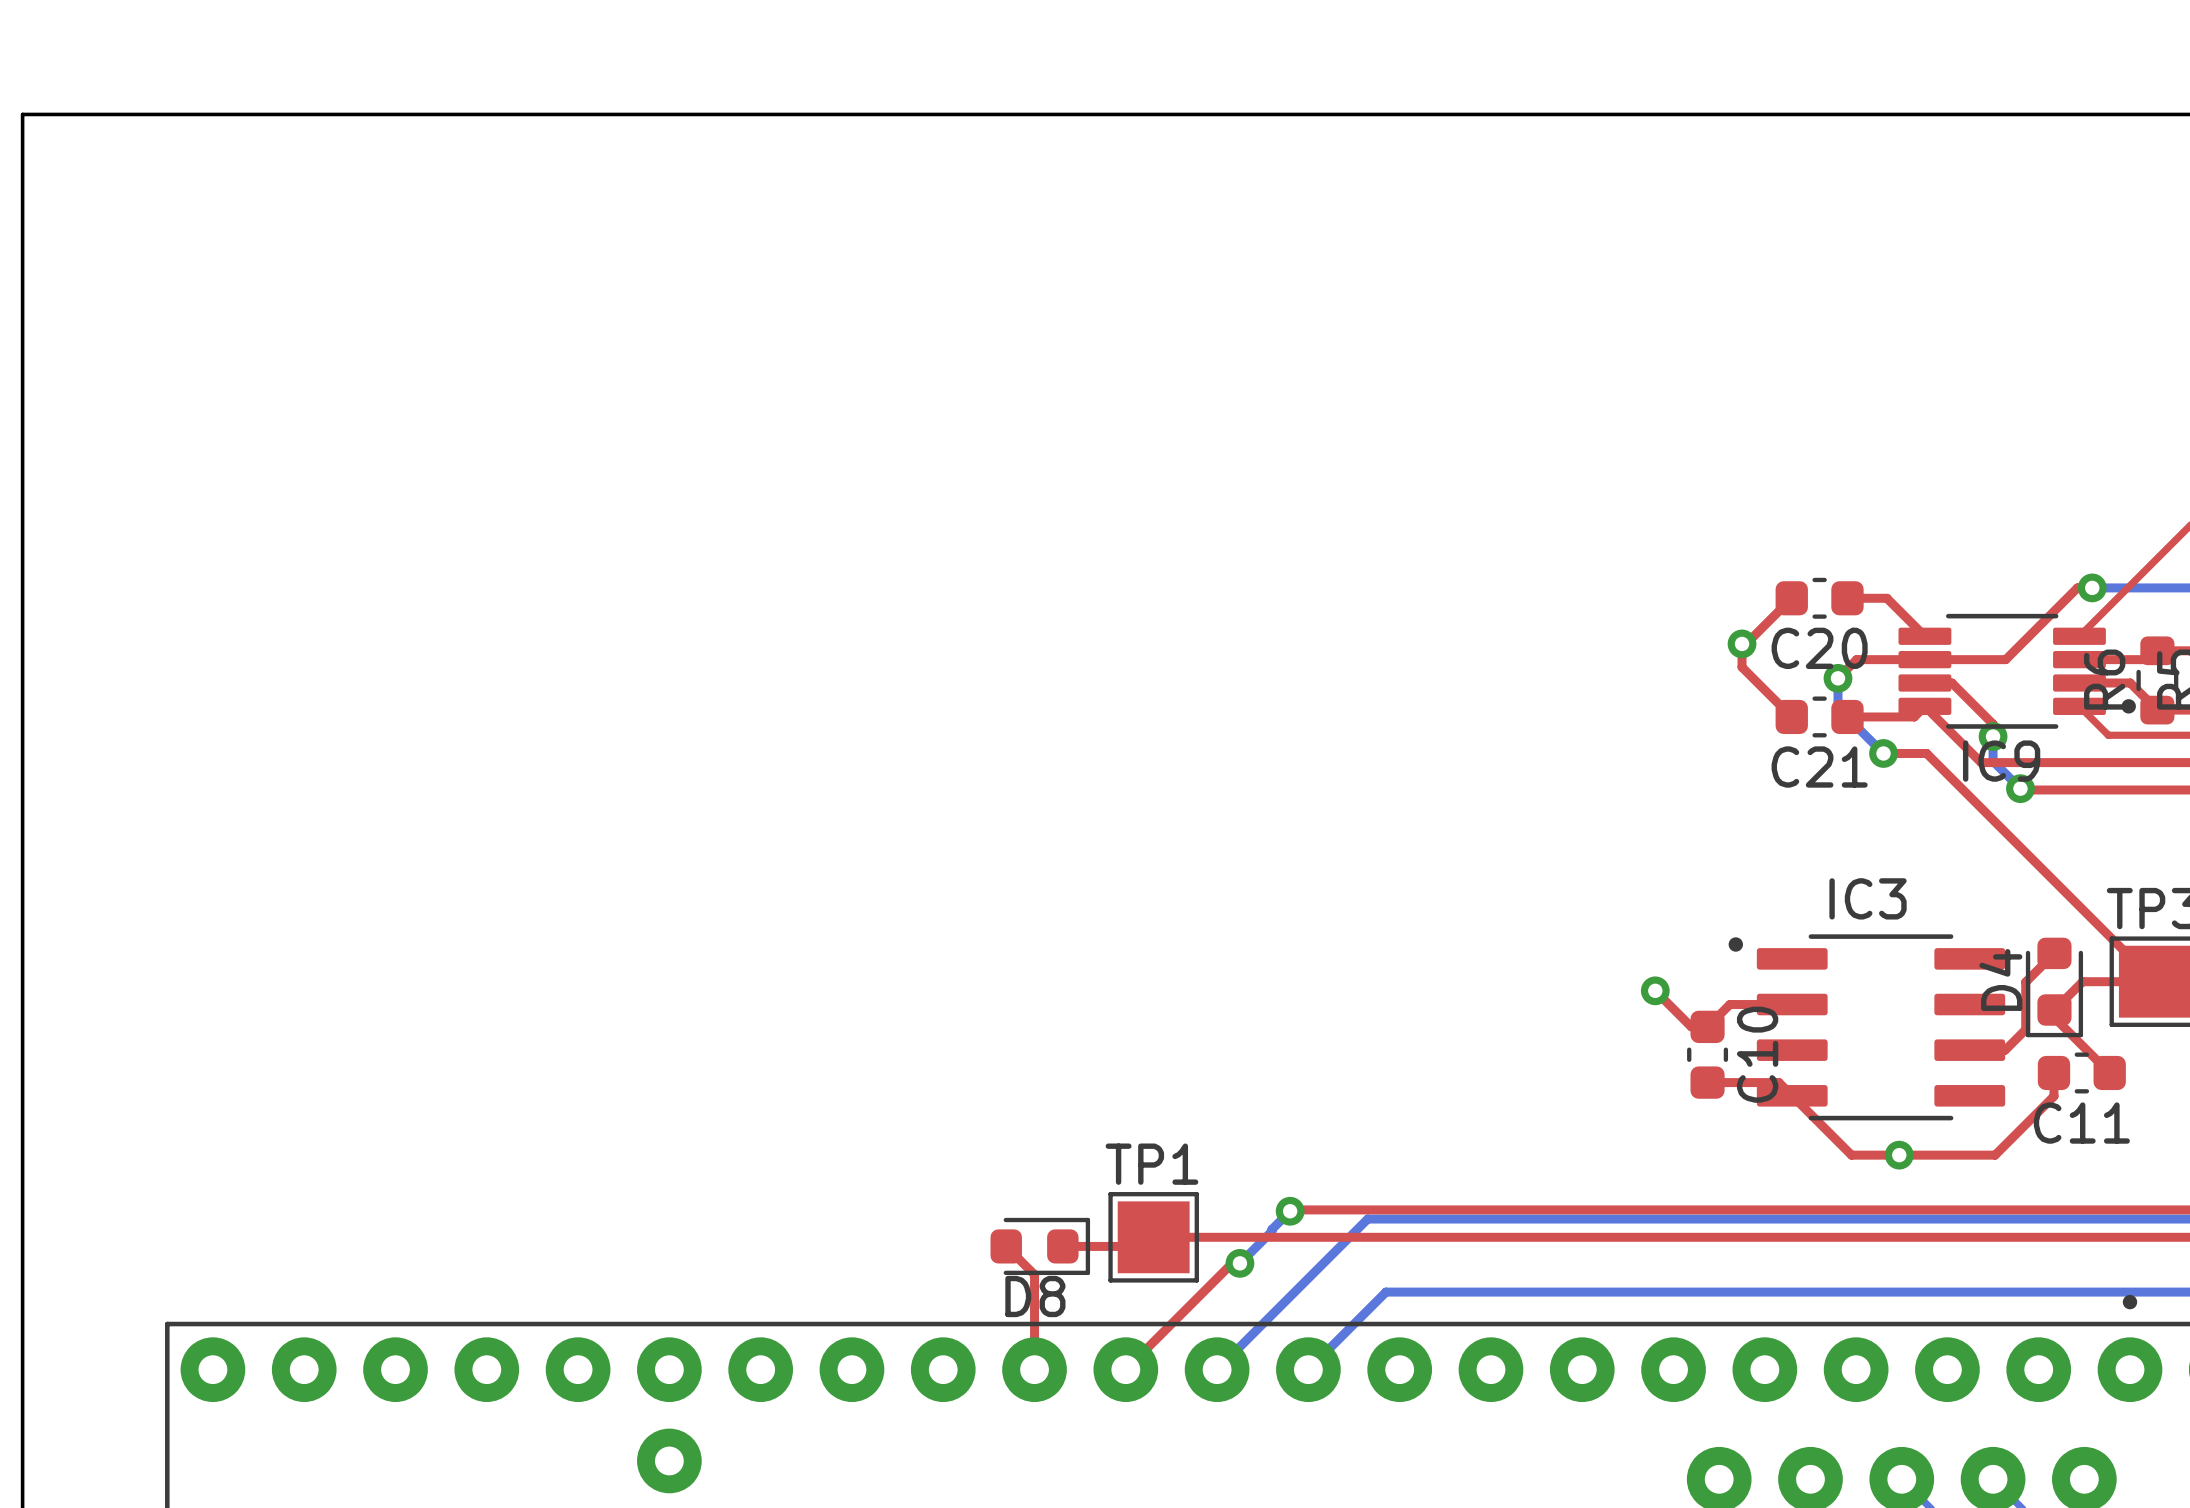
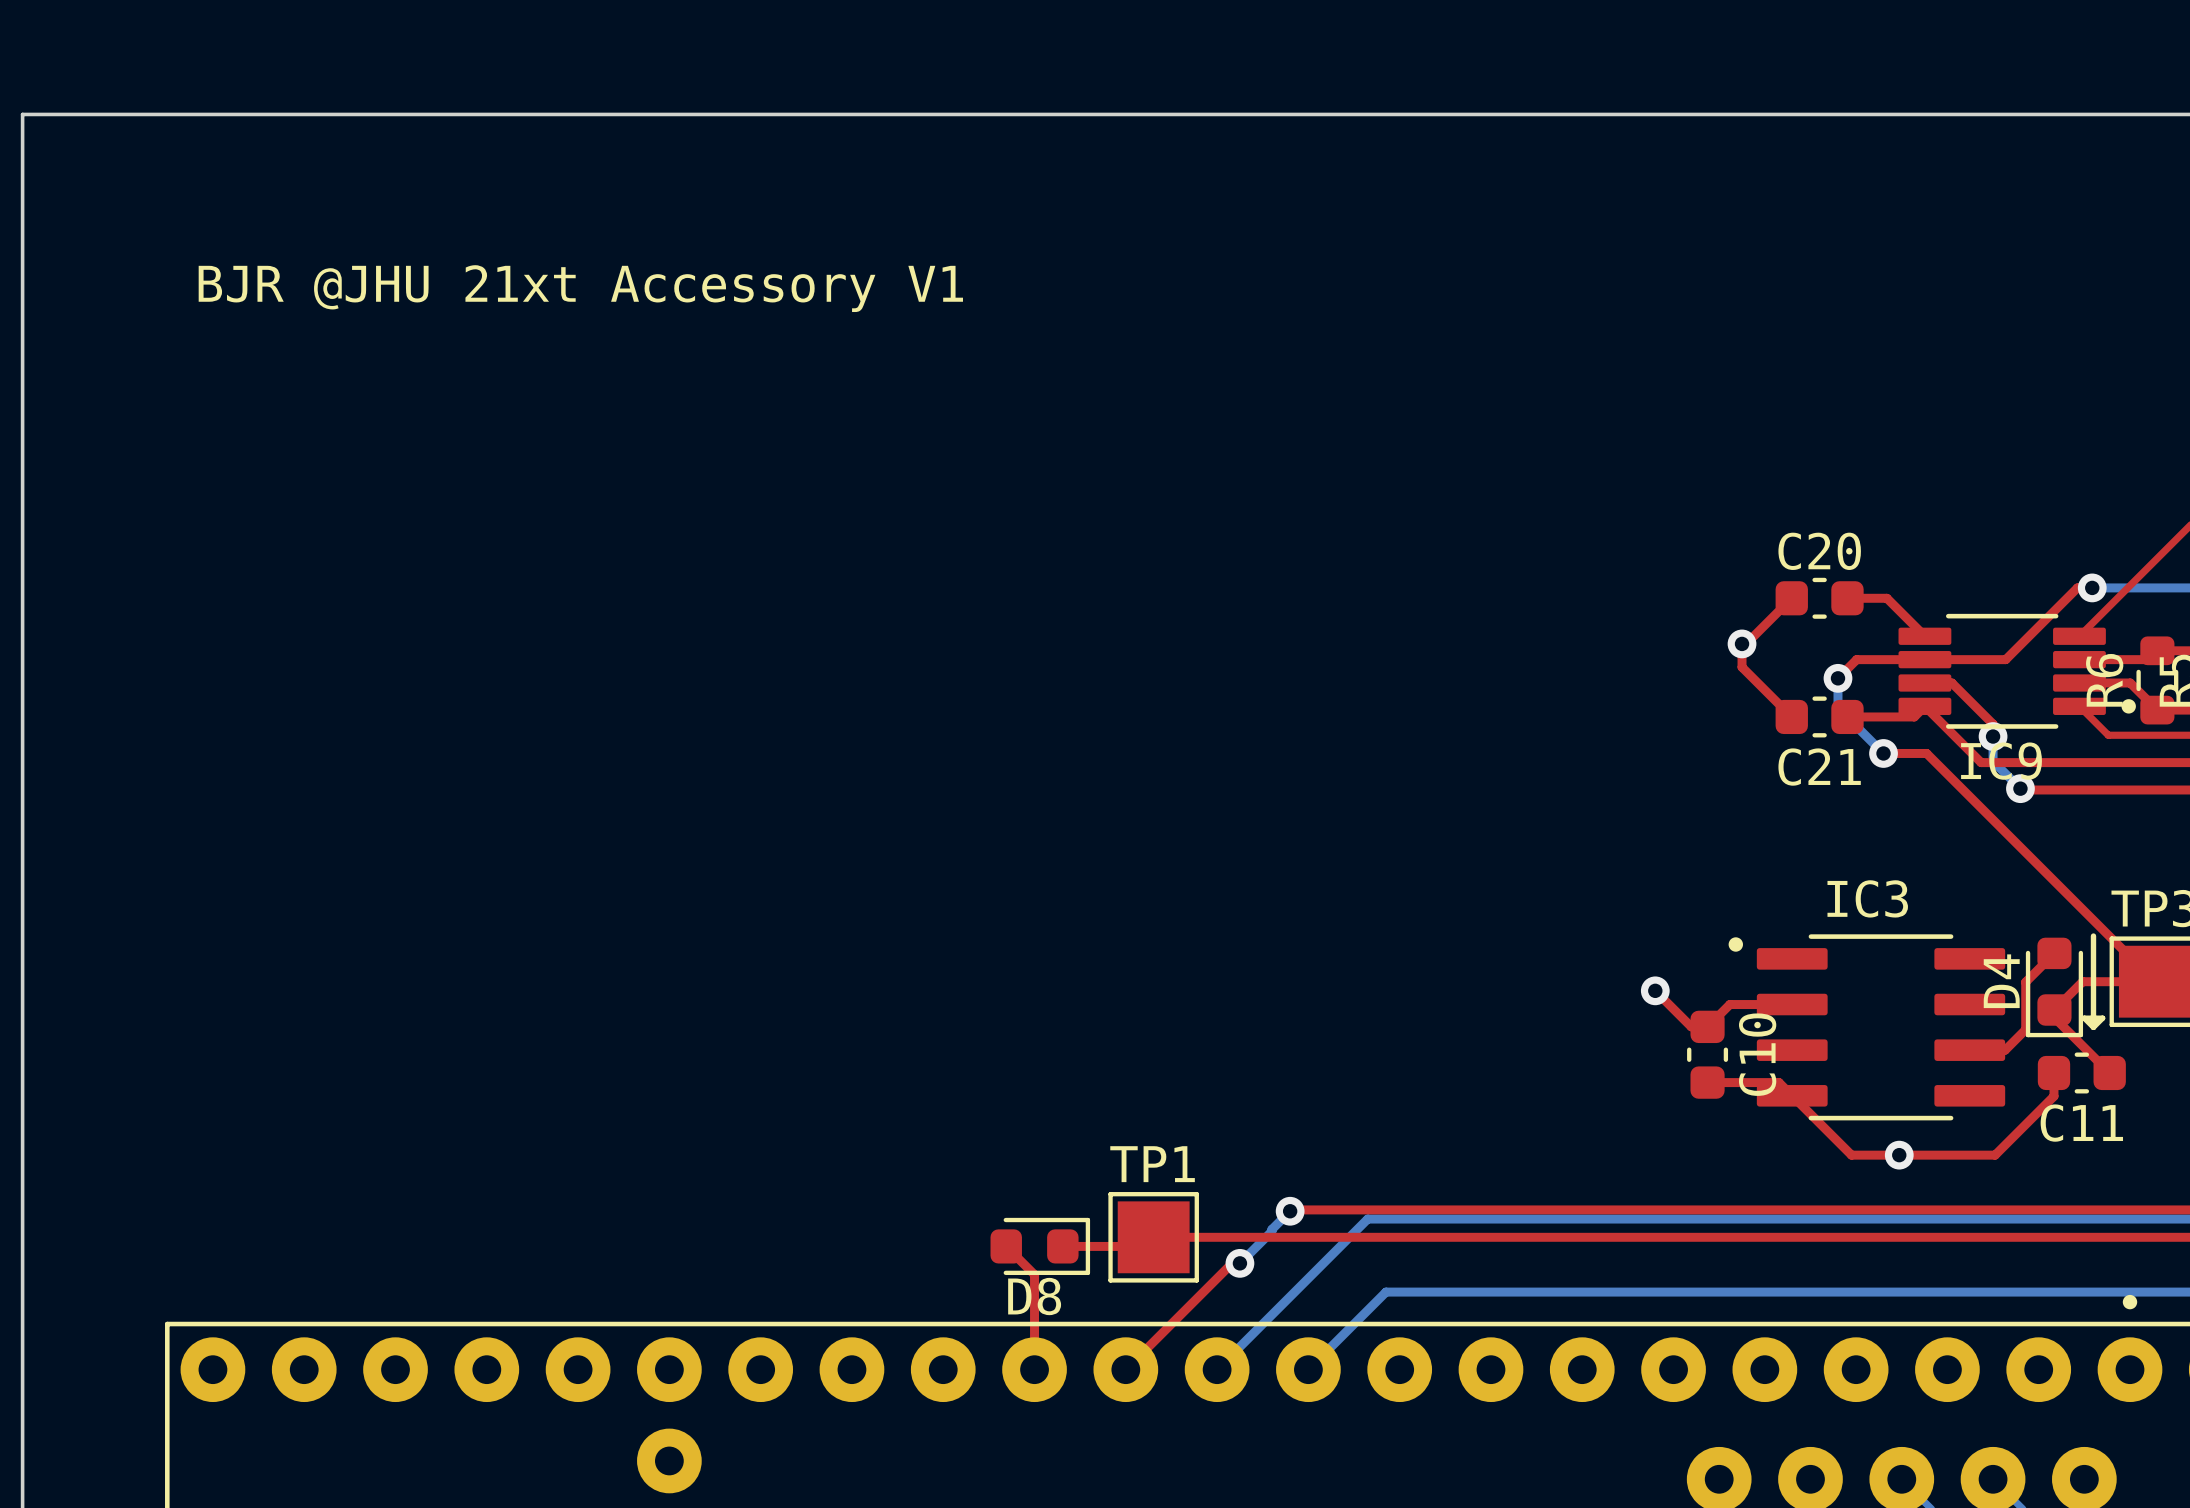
text: none -> BJR @JHU 21xt Accessory V1 (580, 288)
C20 name position: C20 (1819, 648) -> C20 (1819, 551)
line: none -> (2093, 936) (2093, 1027)
line: none -> (2093, 1027) (2102, 1018) (2084, 1018) (2093, 1027)

